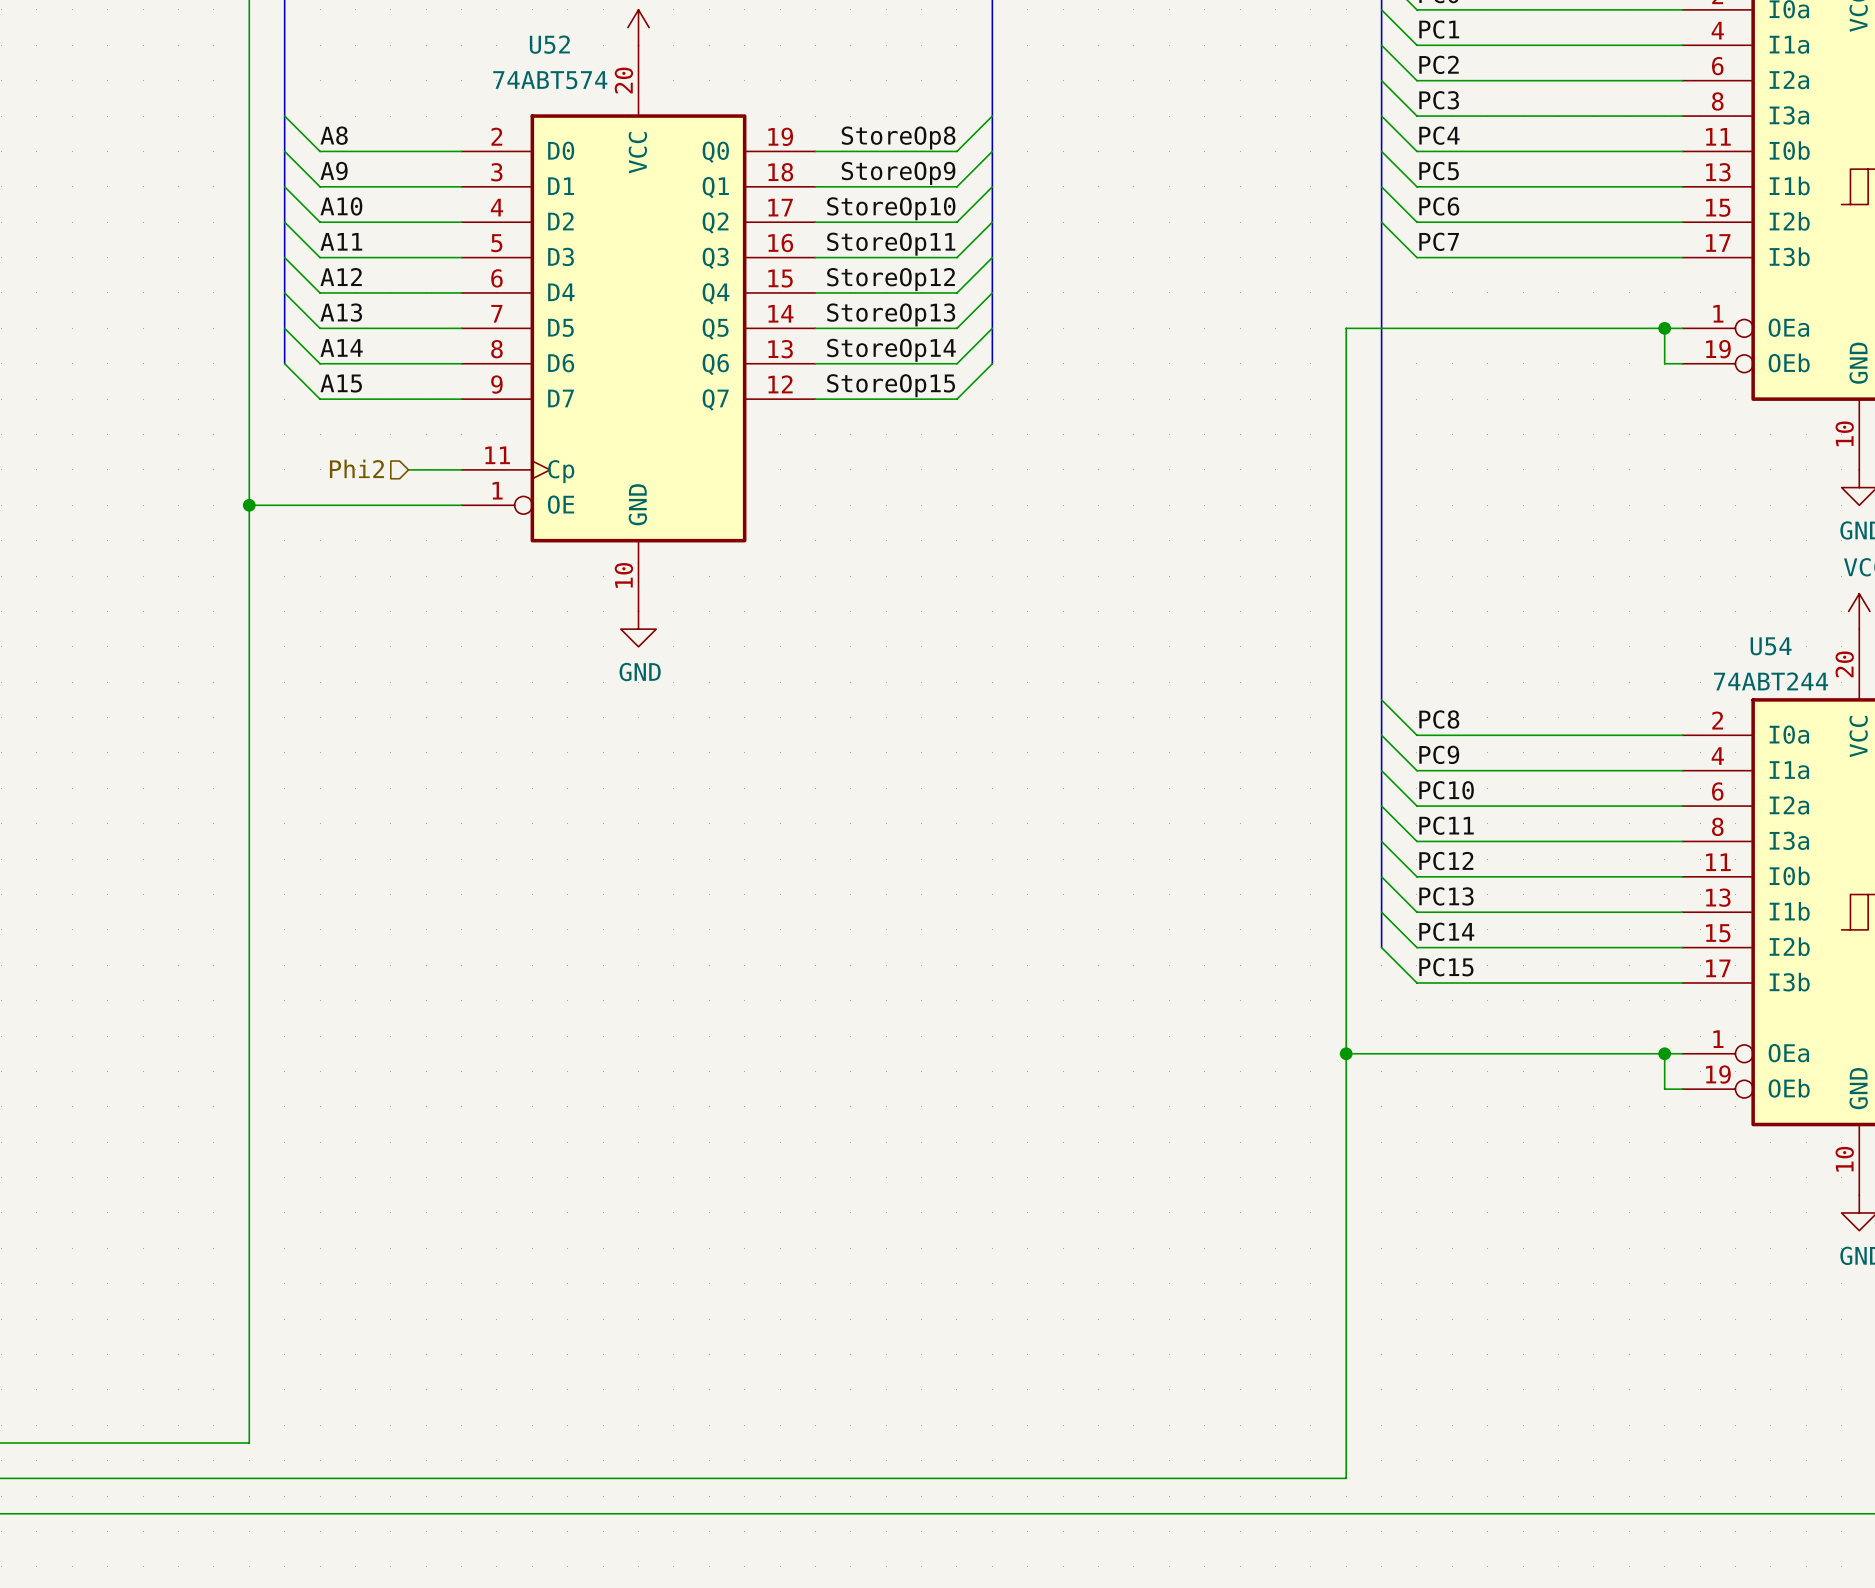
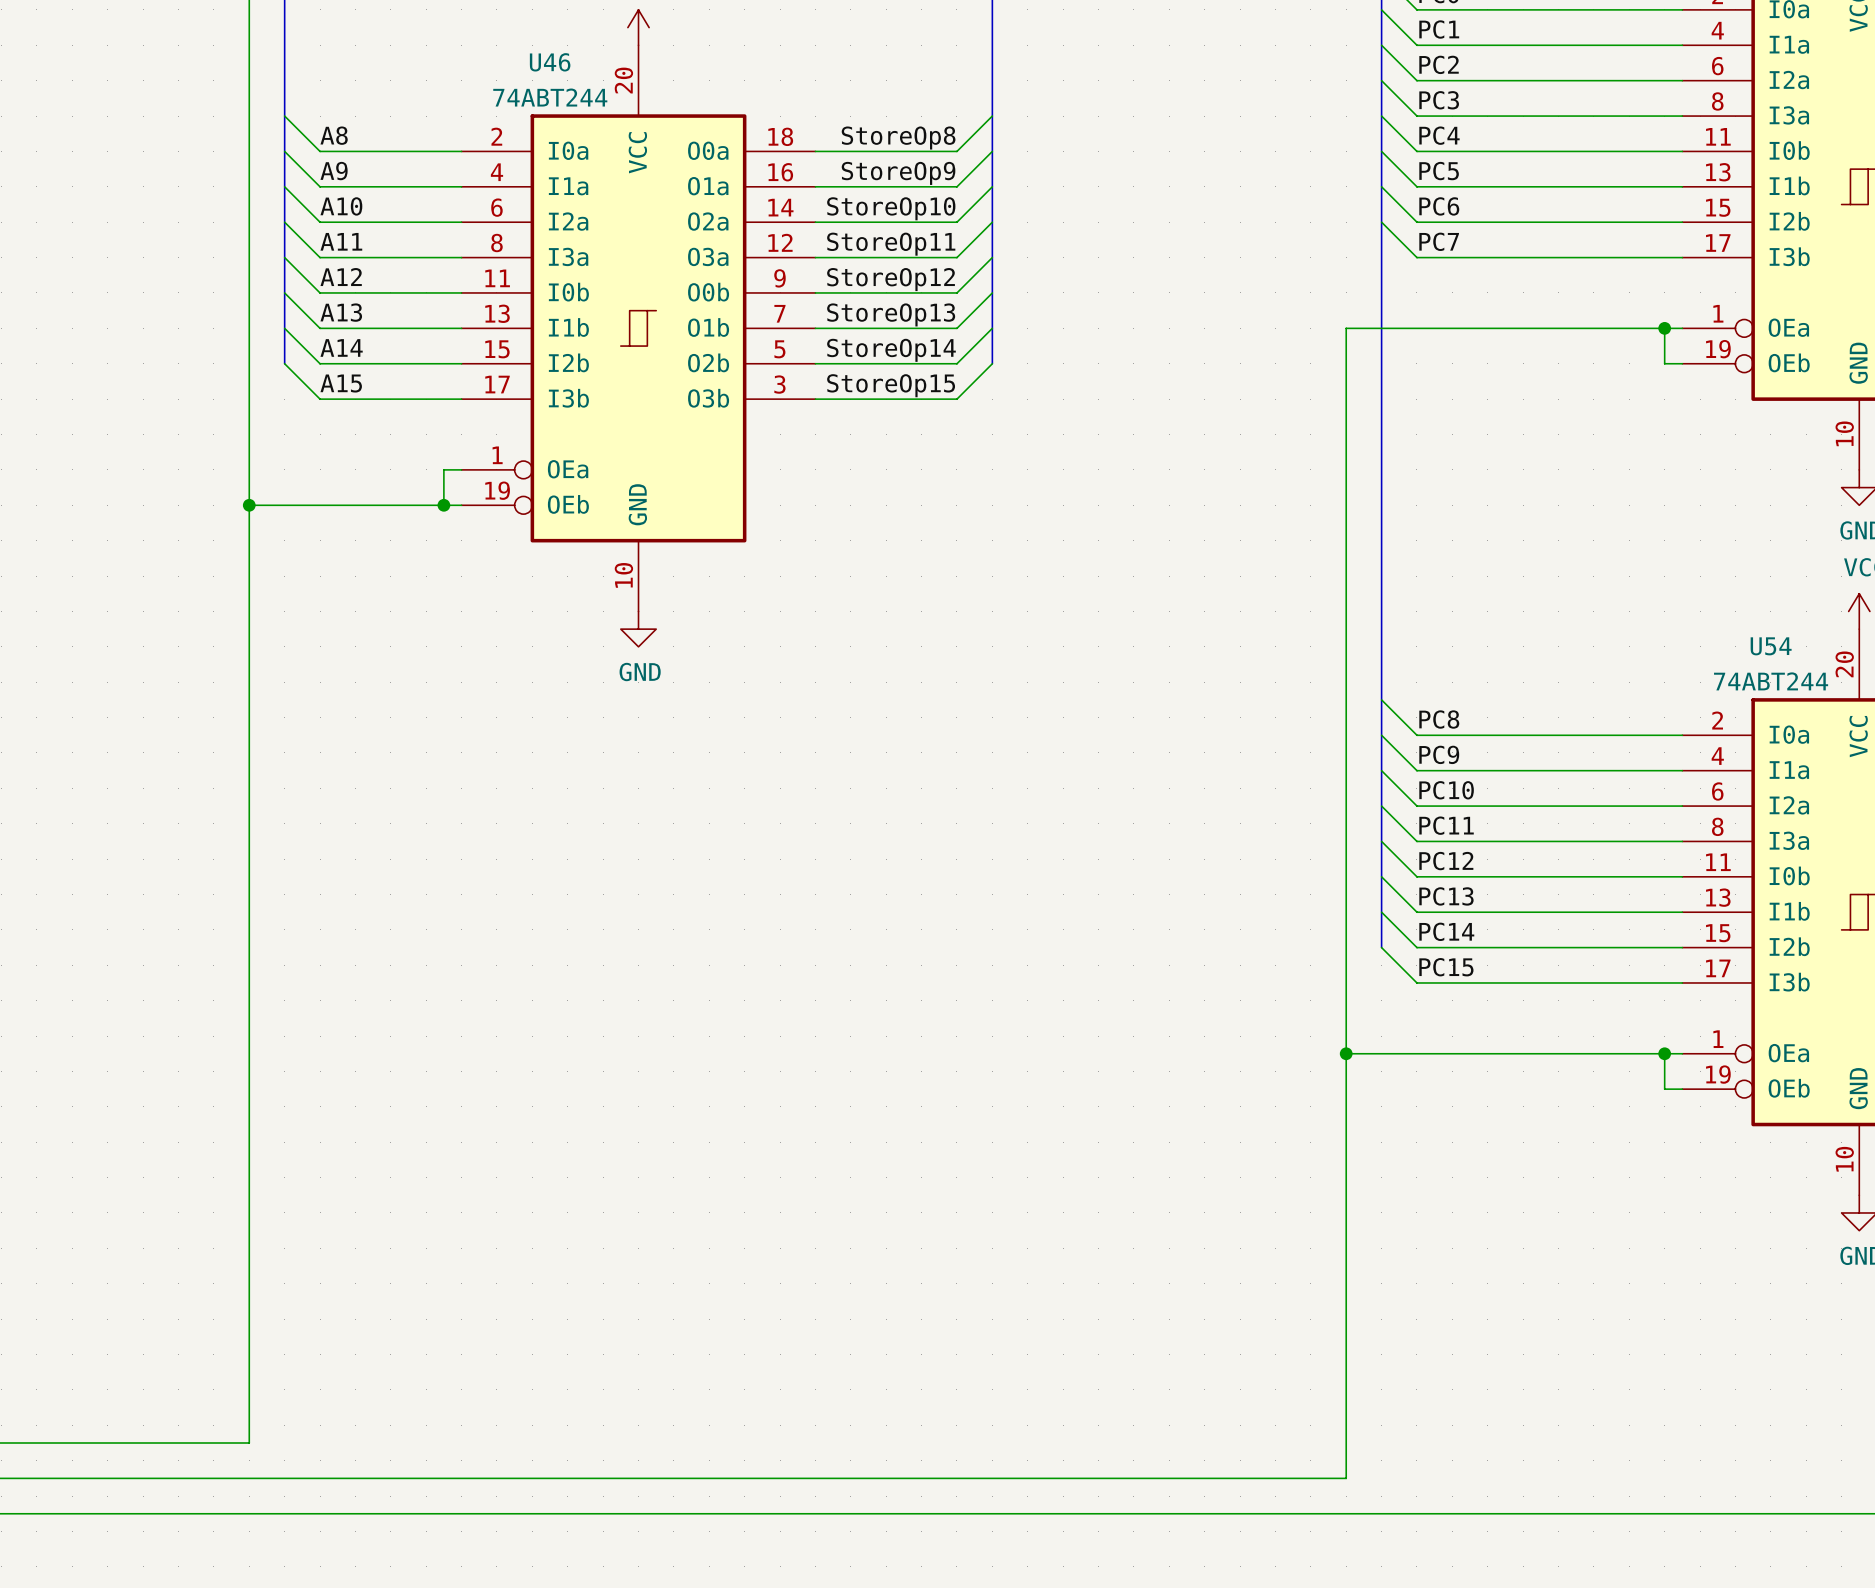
U52: 74ABT574 (638, 328) -> none
U46: none -> 74ABT244 (638, 328)
hierarchical label: Phi2 (356, 468) -> none
wire: (408, 469) (443, 469) -> (443, 505) (443, 469)
junction: none -> (443, 505)

